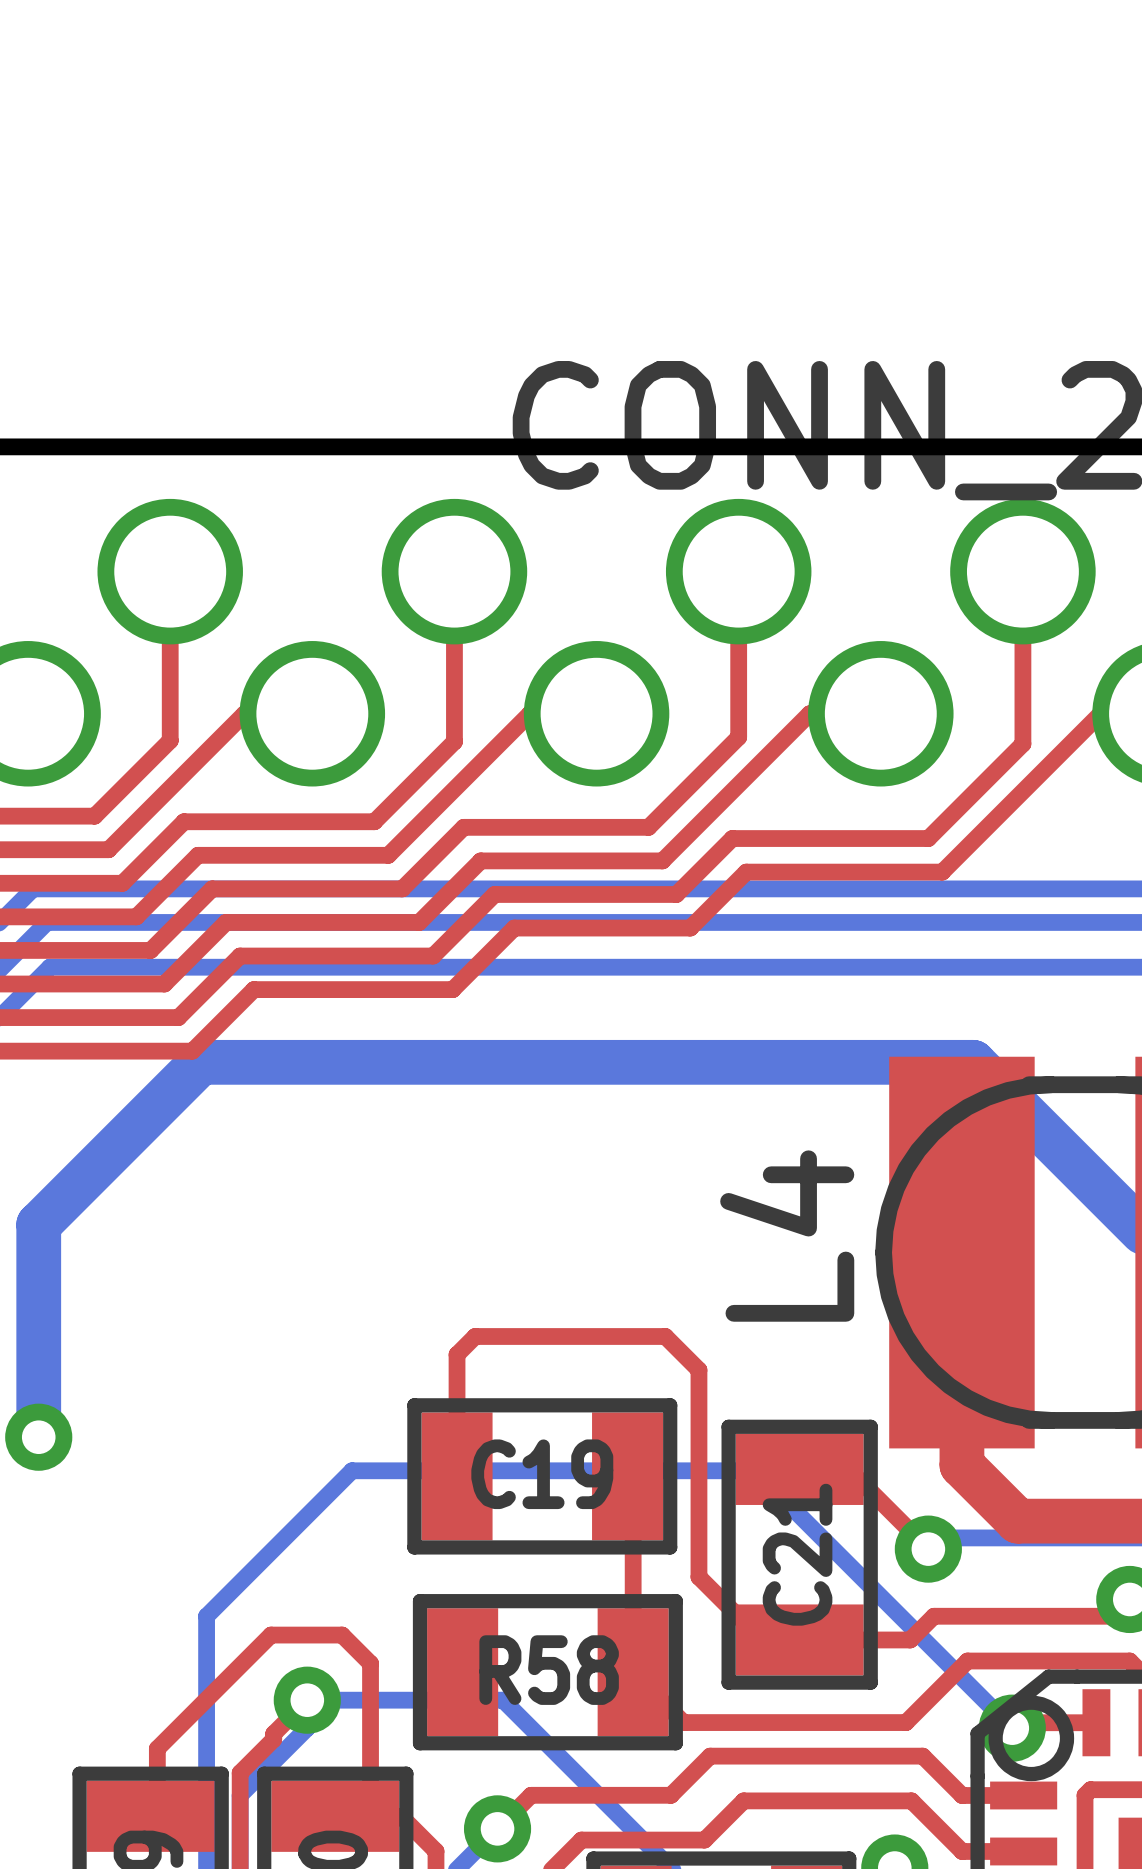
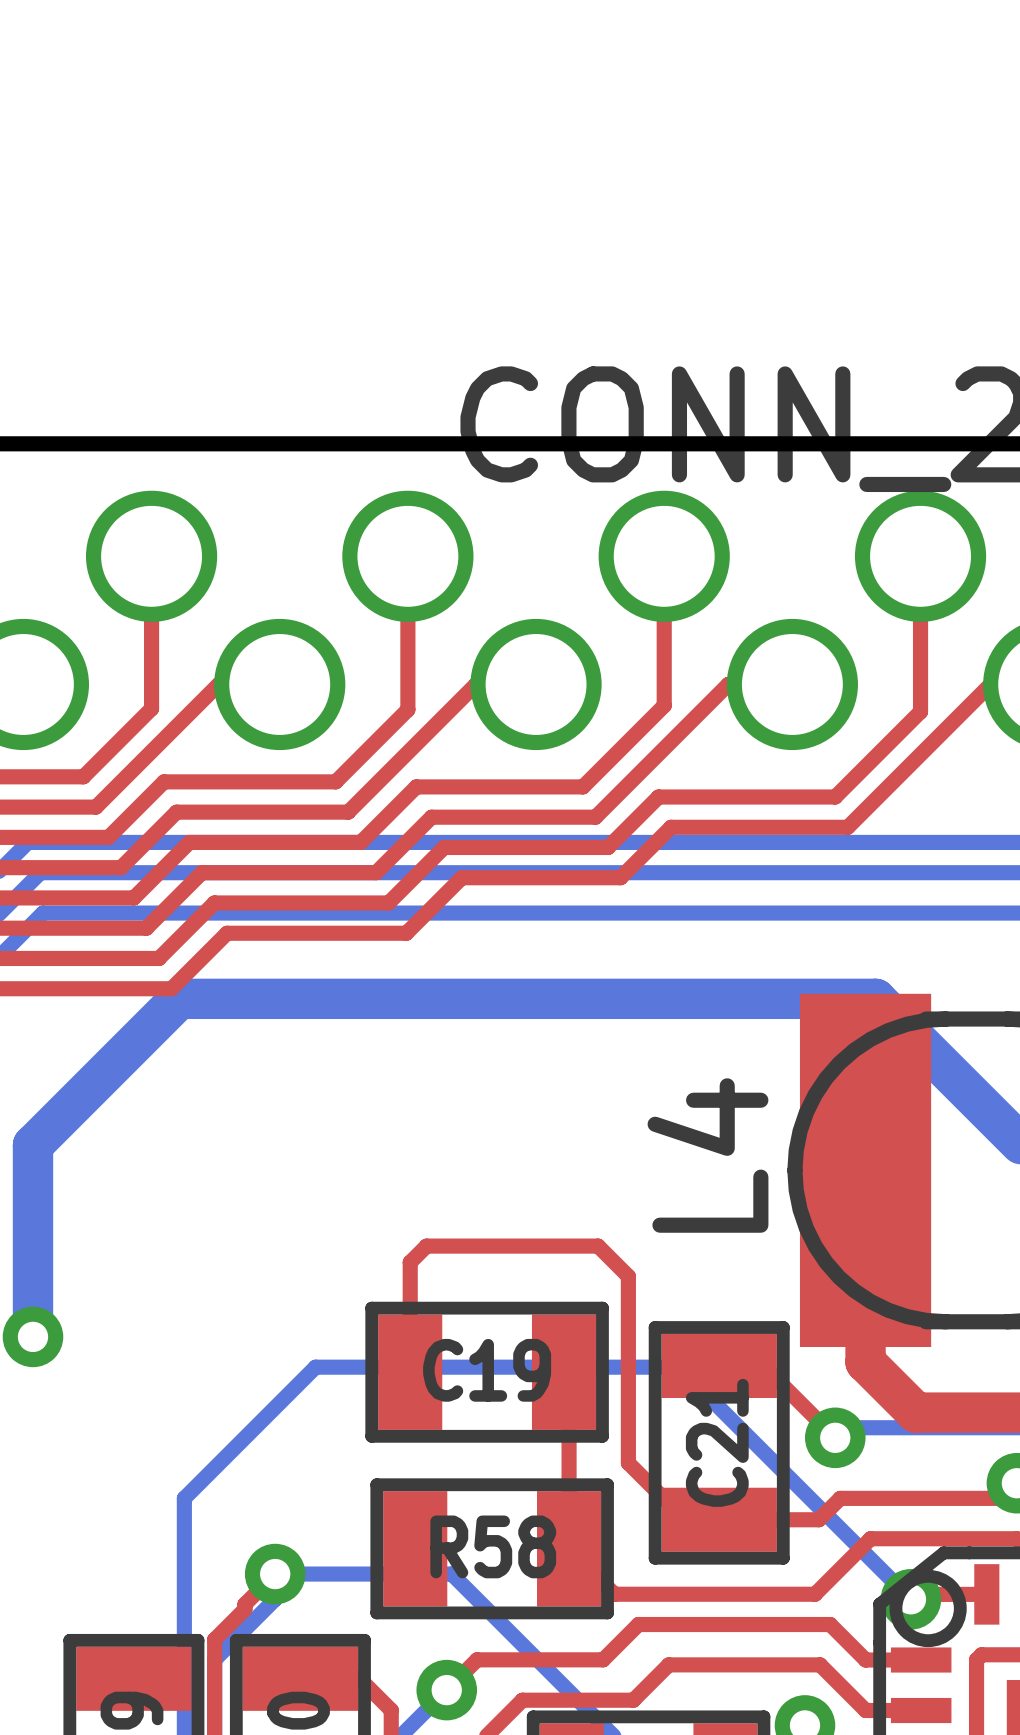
top track: (150, 1816) (157, 1819) (157, 1748) (271, 1635) (342, 1635) (370, 1663) (370, 1791) (342, 1819) (335, 1816) -> none

